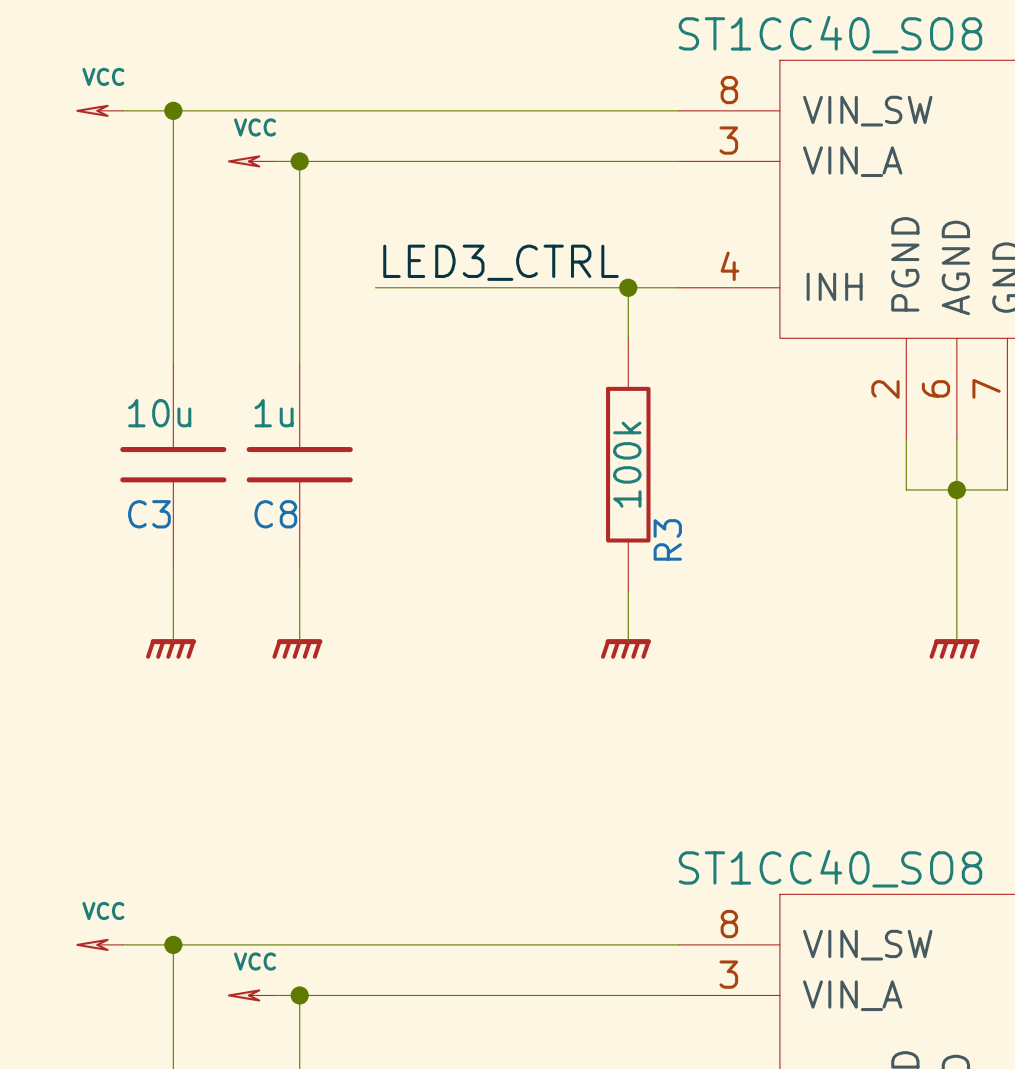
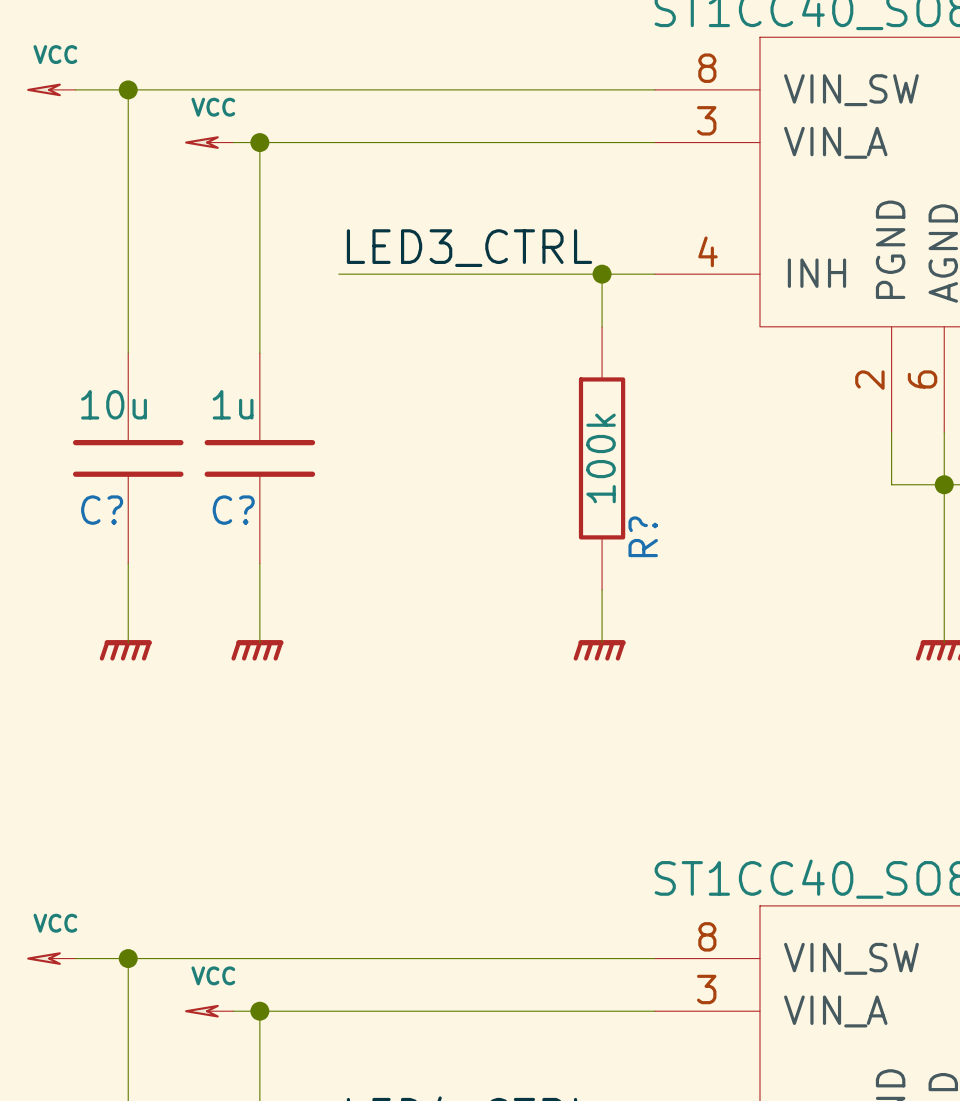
C3 name: C3 (149, 514) -> C? (102, 510)
C8 name: C8 (275, 514) -> C? (233, 510)
R3 name: R3 (667, 539) -> R? (643, 536)

